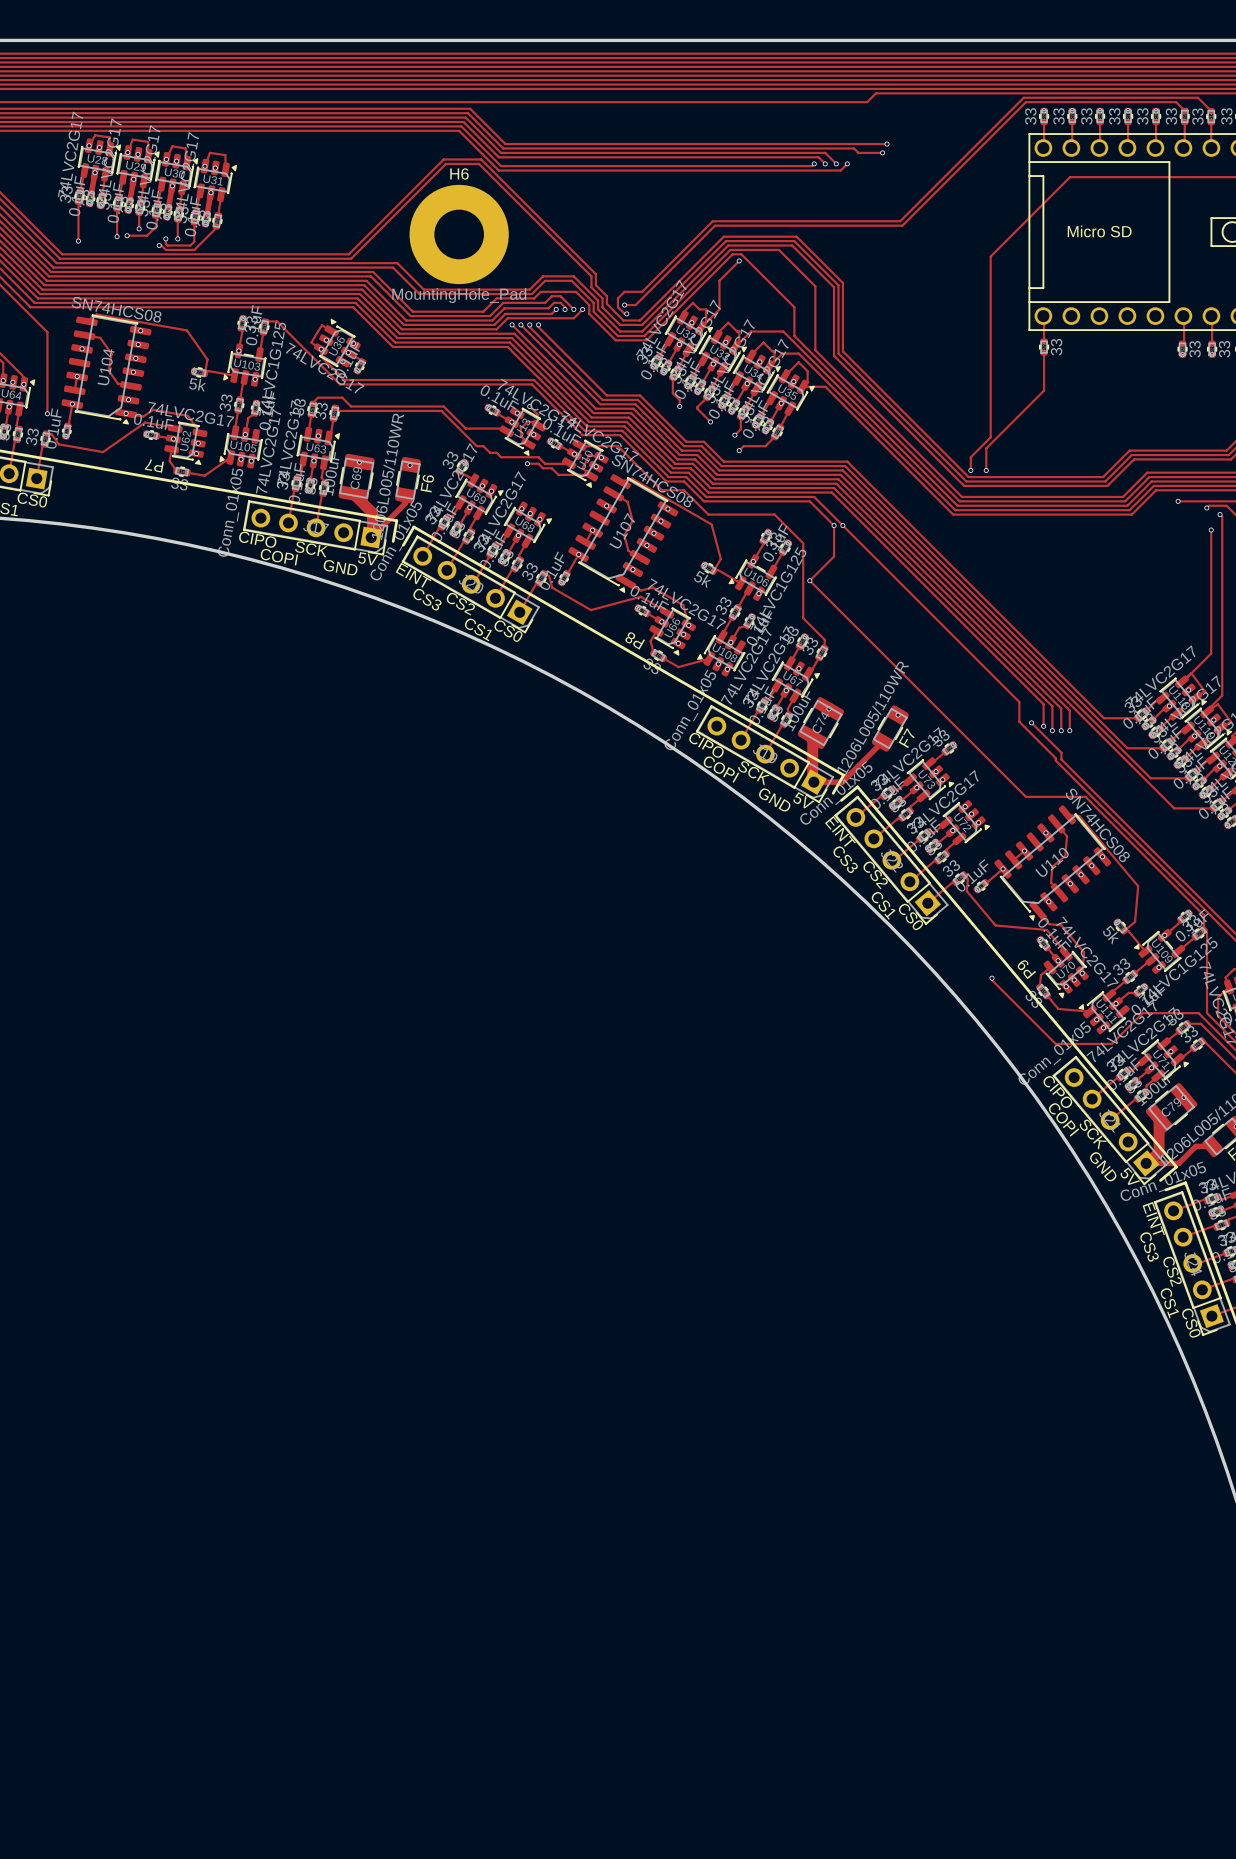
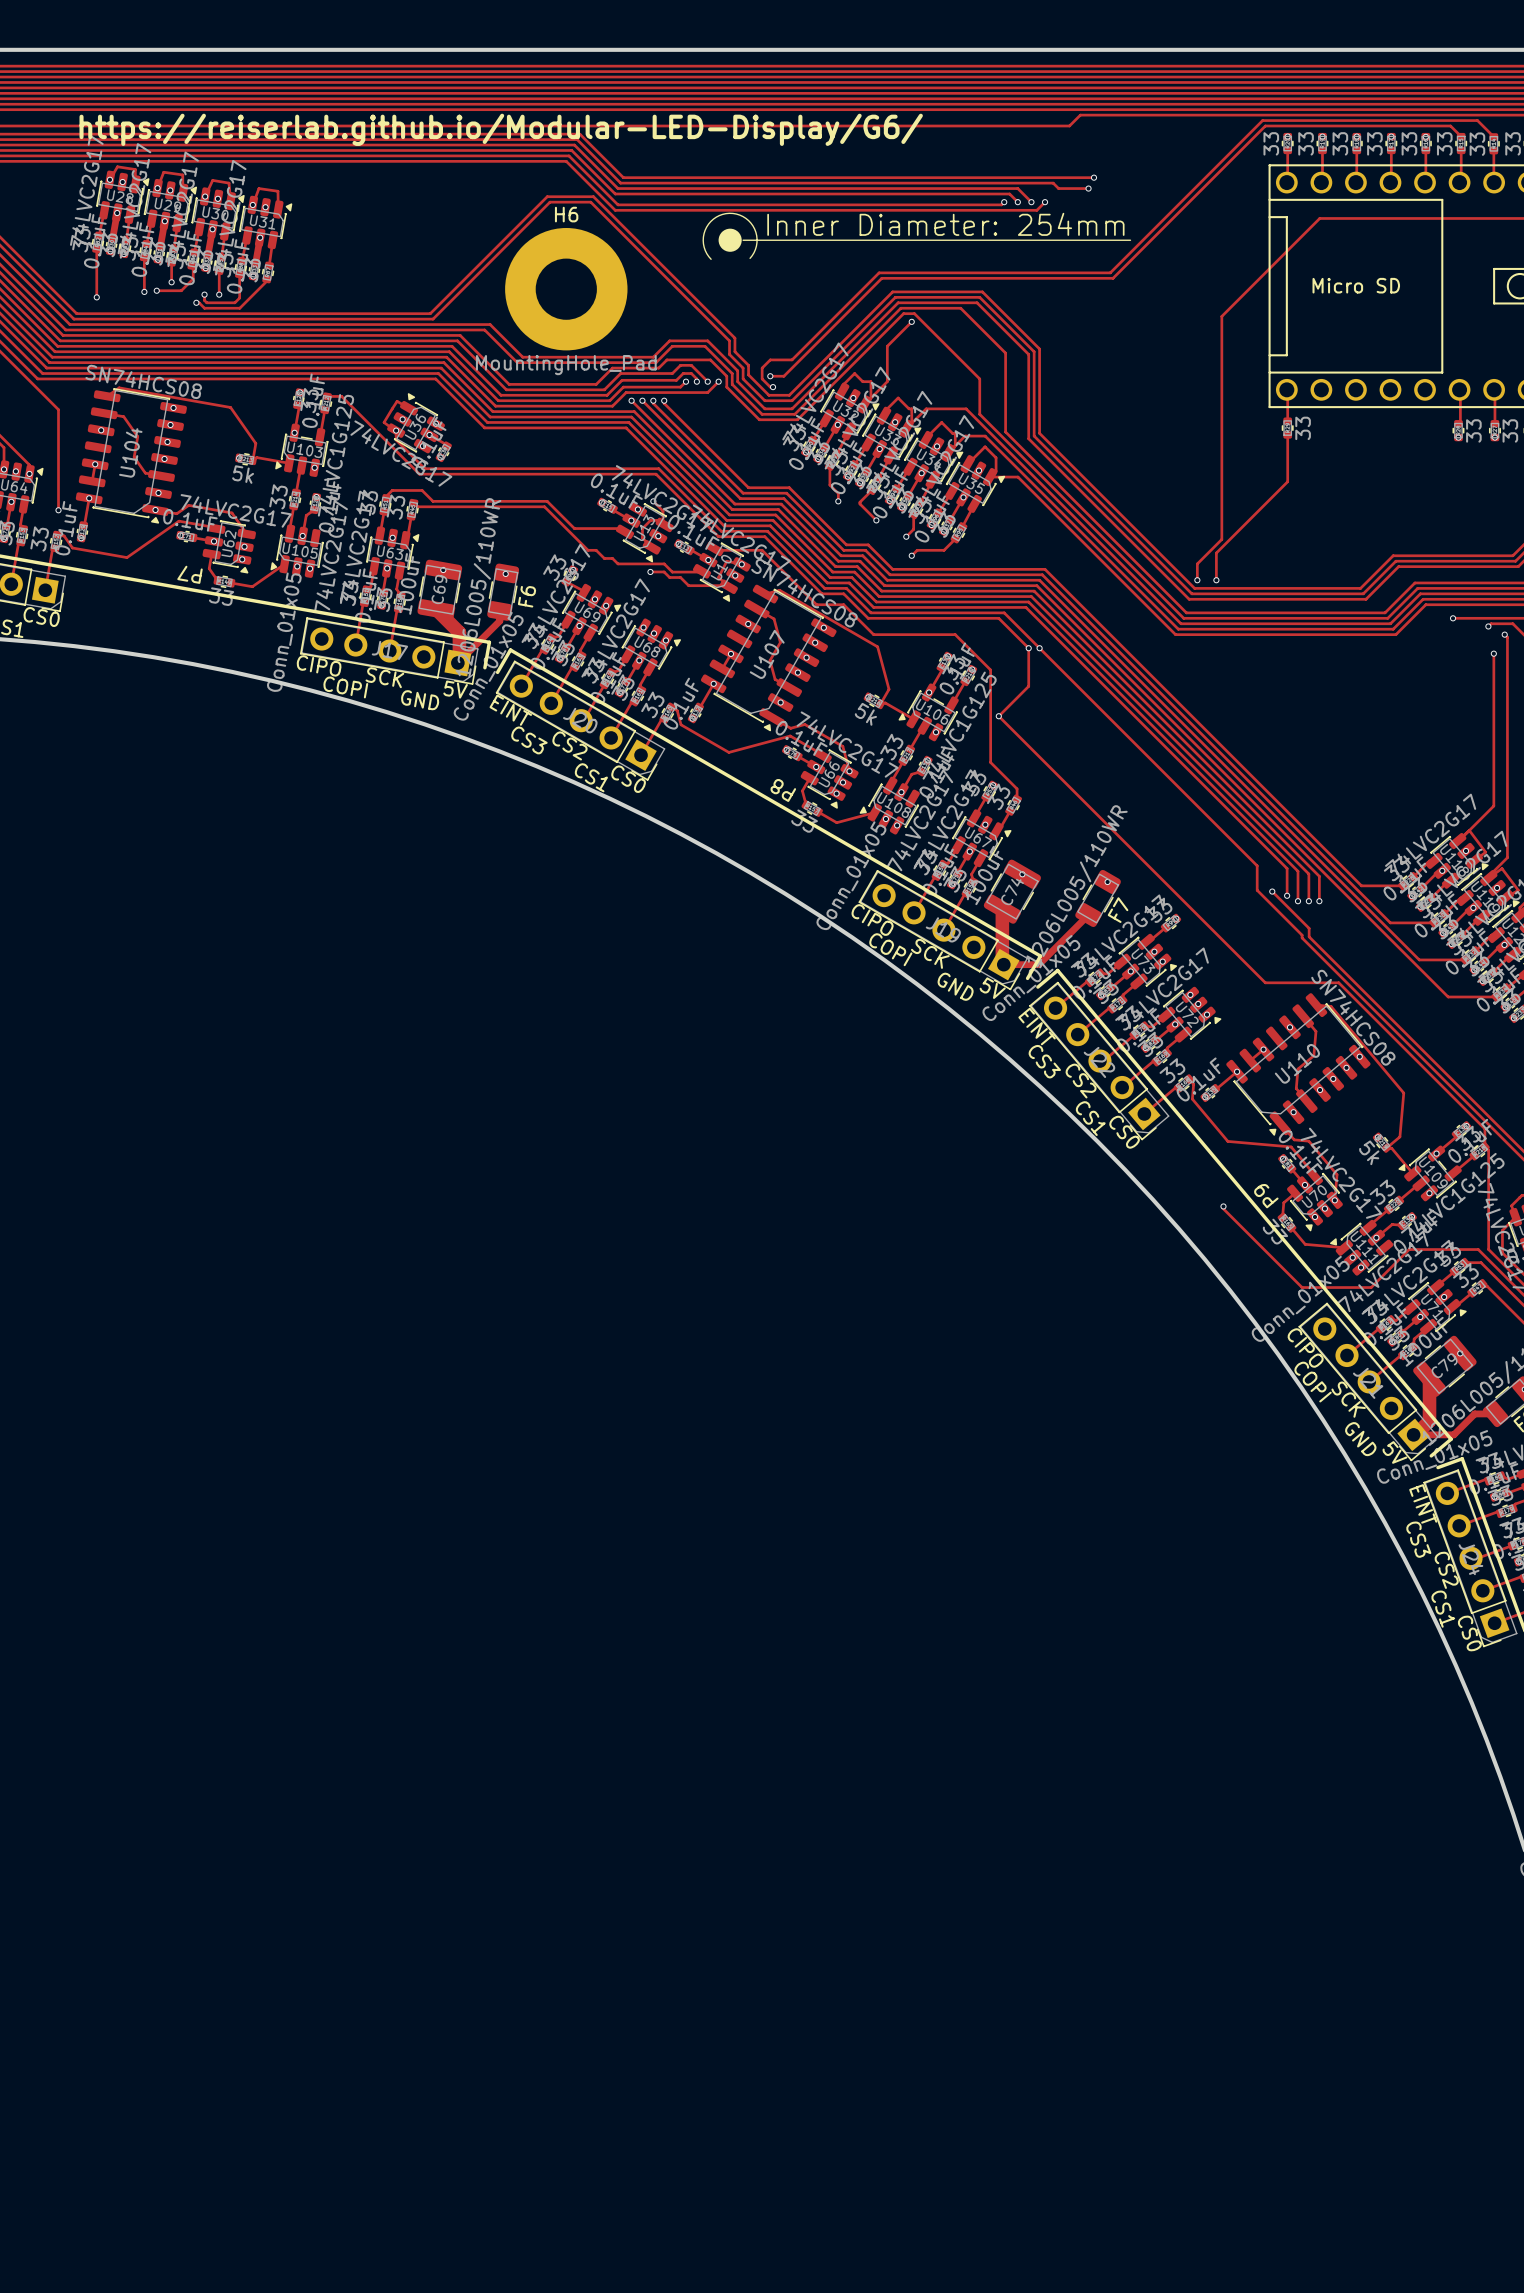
text: none -> https://reiserlab.github.io/Modular-LED-Display/G6/ (501, 129)
text: none -> Inner Diameter: 254mm (945, 224)
drawing: none -> [718, 228, 742, 252]
line: none -> (743, 240) (1130, 240)
line: none -> (750, 258) (756, 242) (754, 229) (742, 216) (729, 213) (716, 217) (705, 230) (703, 243) (711, 259)

